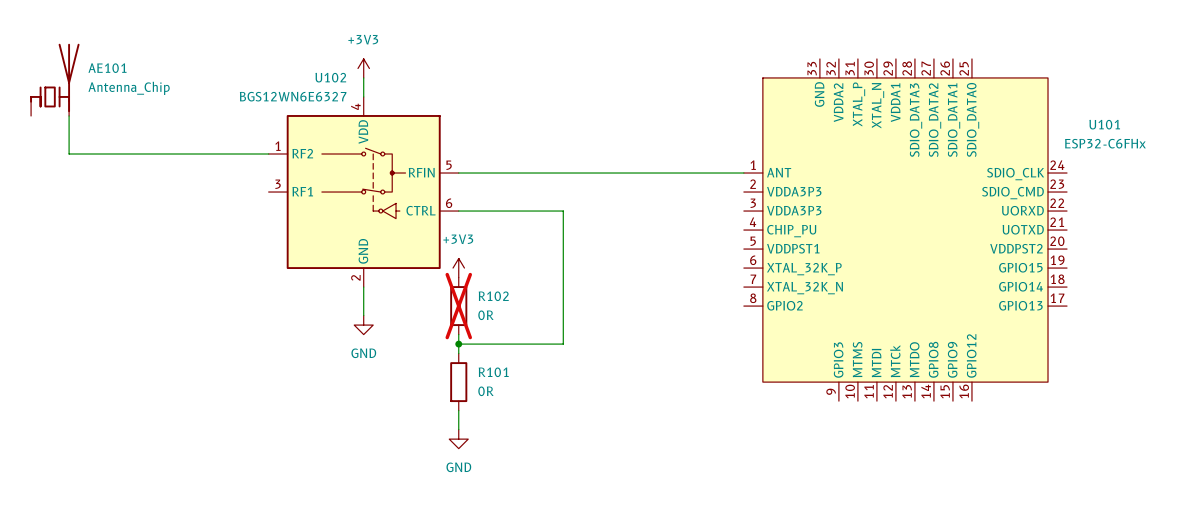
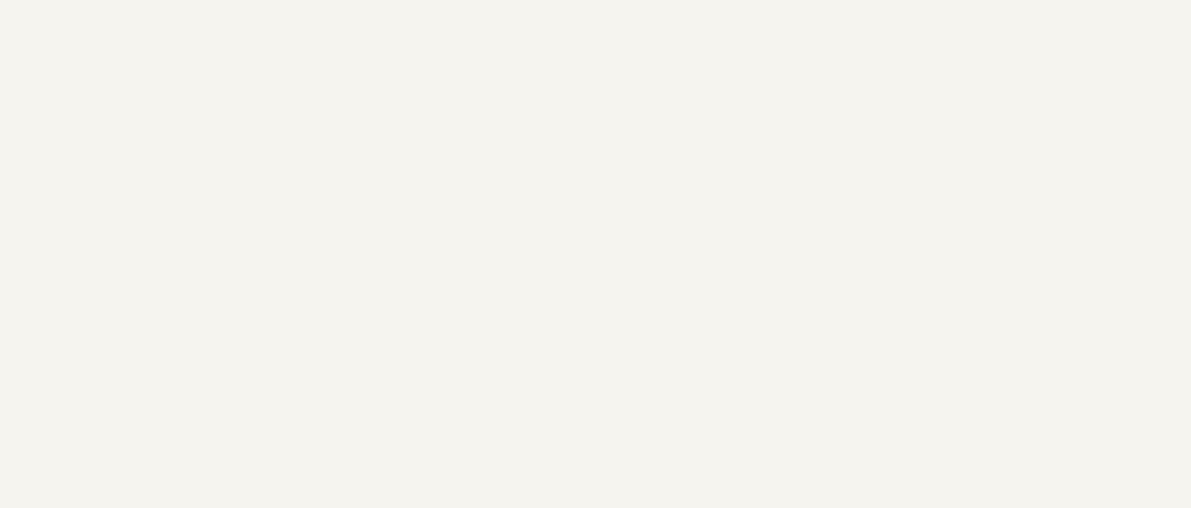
power symbol: +3V3 (363, 68) -> none
wire: (363, 77) (363, 96) -> none
AE101: Antenna_Chip (54, 79) -> none
wire: (69, 115) (69, 154) (268, 154) -> none
wire: (458, 173) (743, 173) -> none
U102: BGS12WN6E6327 (363, 192) -> none
wire: (458, 211) (563, 211) (563, 344) (458, 344) -> none
U101: ESP32-C6FHx (905, 230) -> none
power symbol: +3V3 (458, 268) -> none
wire: (363, 287) (363, 315) -> none
R102: 0R (458, 306) -> none
power symbol: GND (363, 325) -> none
wire: (458, 334) (458, 353) -> none
junction: (458, 344) -> none
R101: 0R (458, 382) -> none
wire: (458, 410) (458, 429) -> none
power symbol: GND (458, 439) -> none

